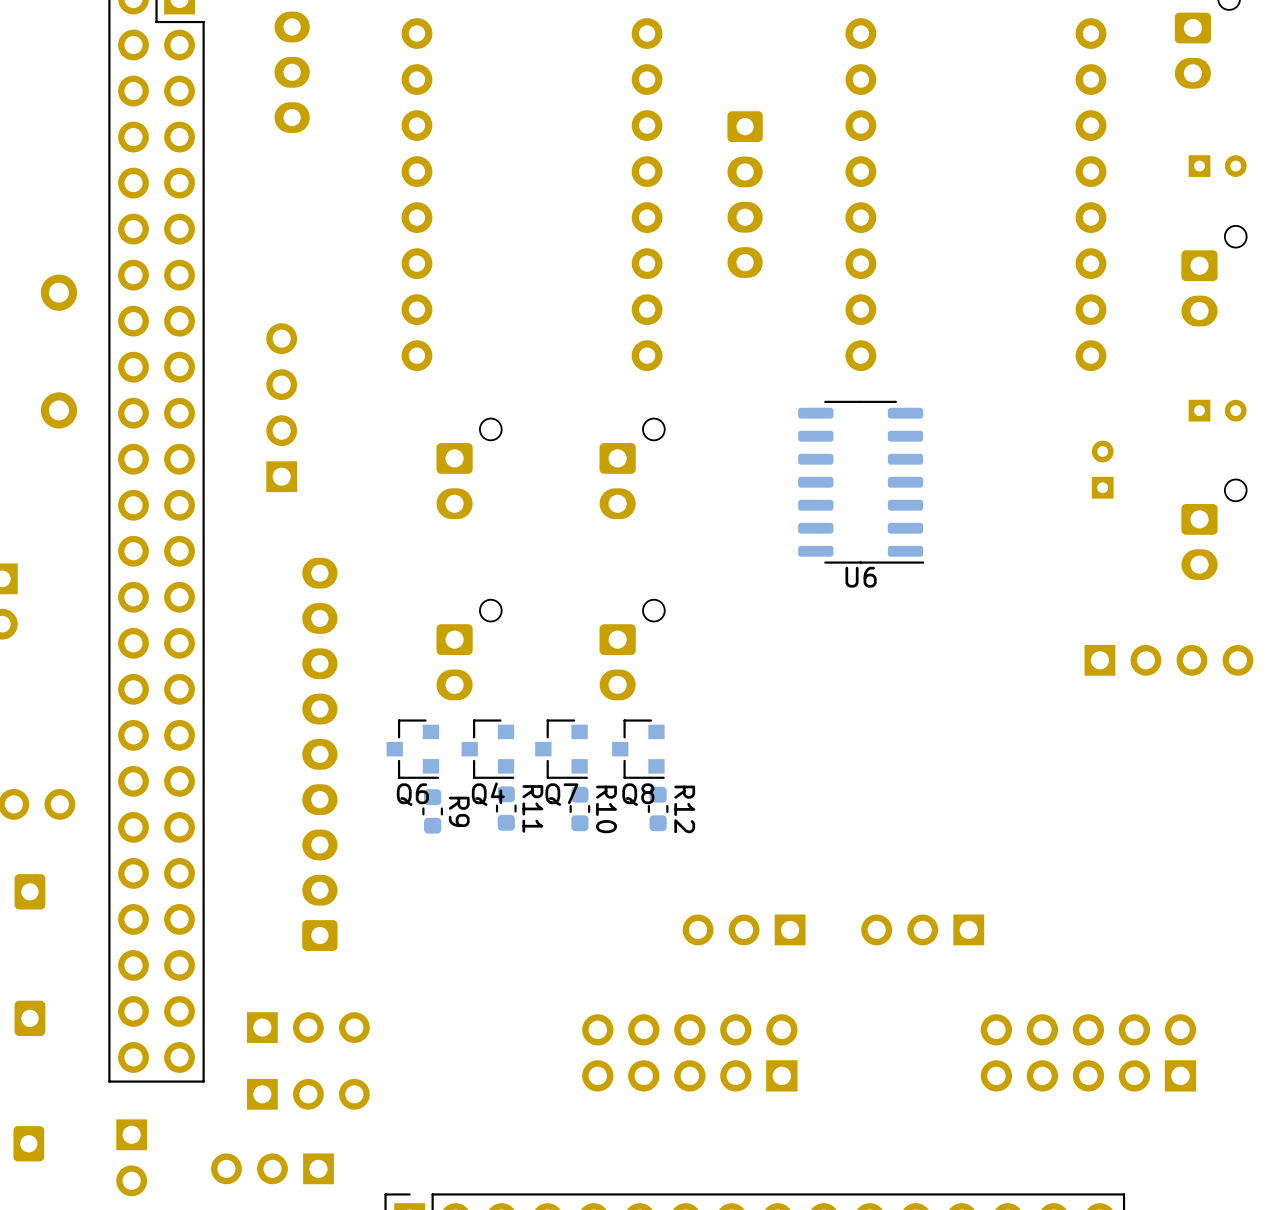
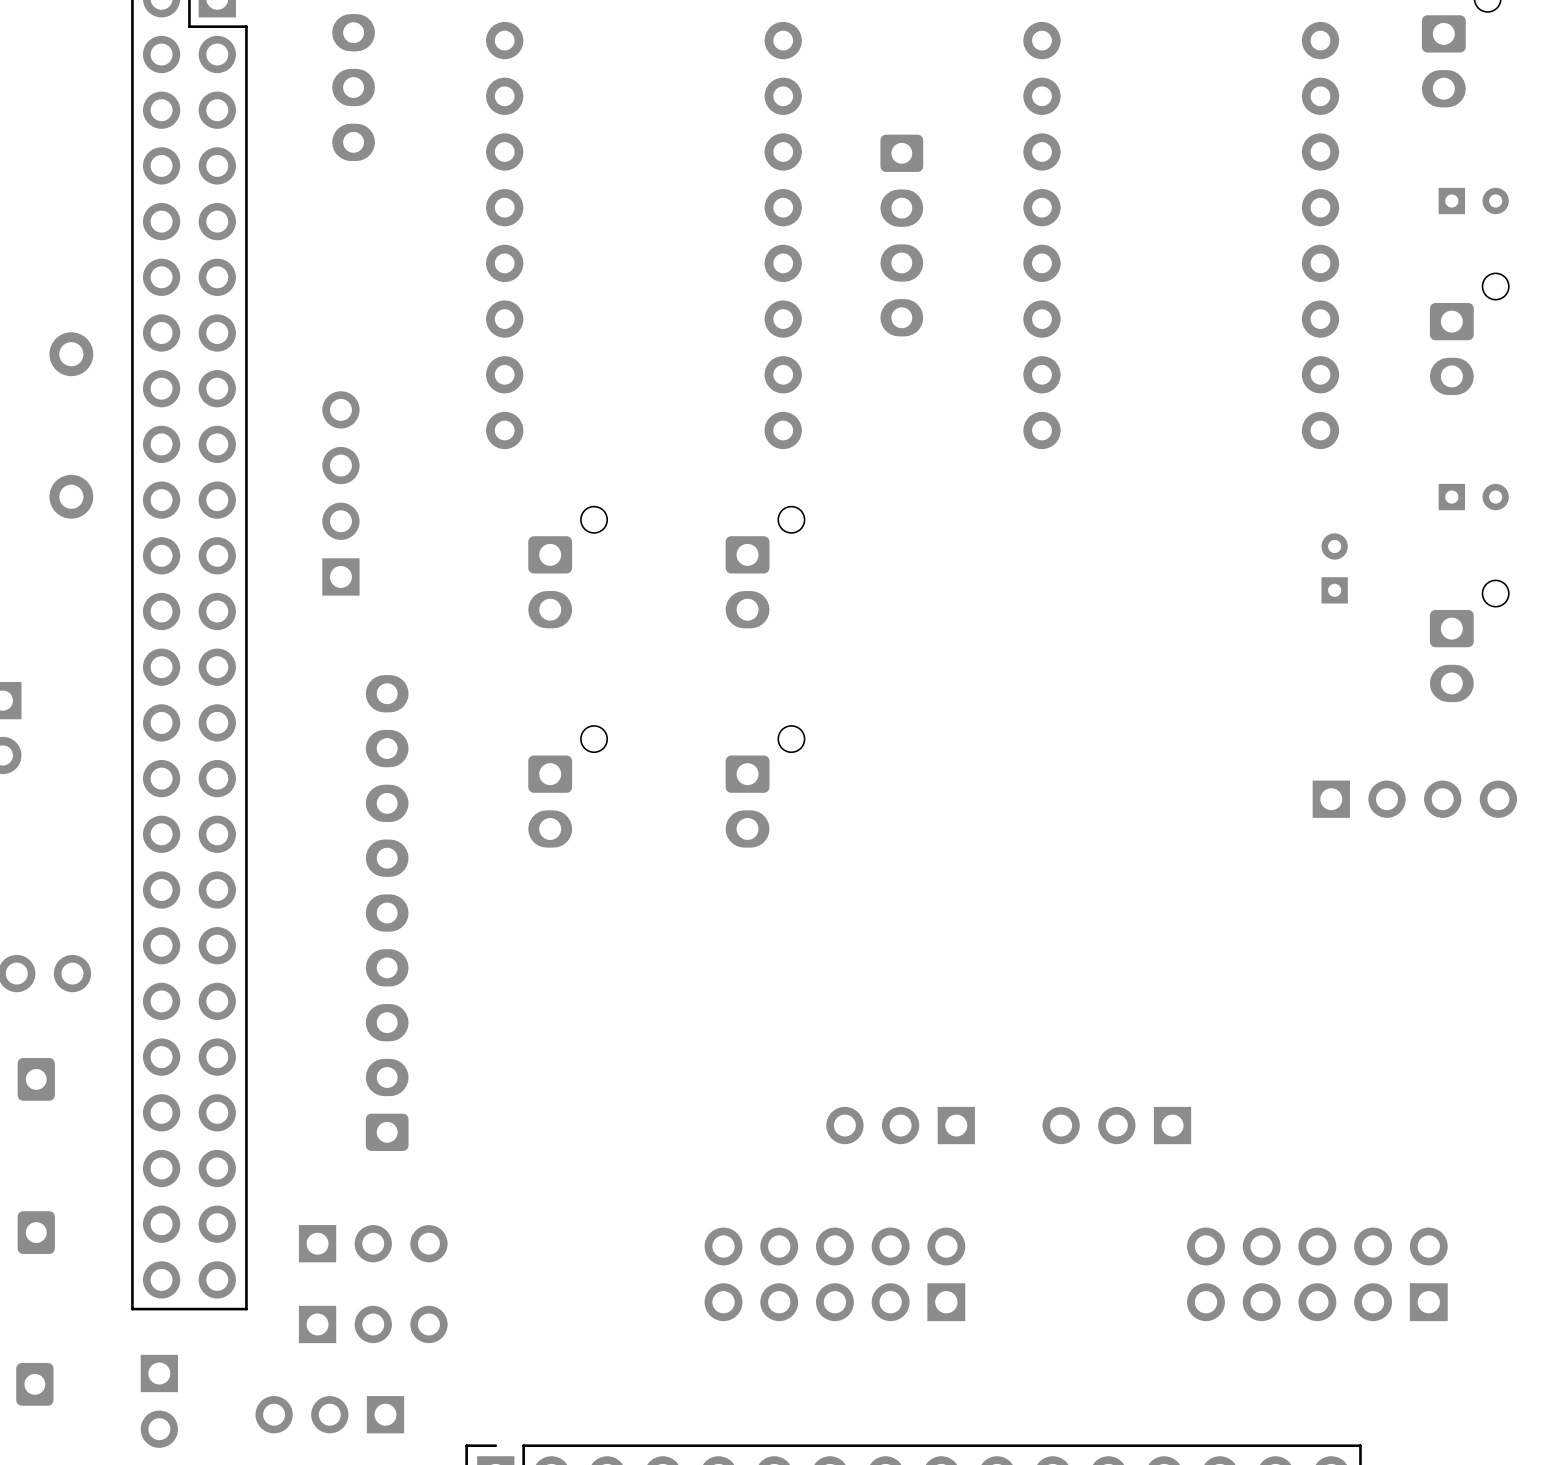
U6: (861, 482) -> none
Q6: (412, 749) -> none
Q4: (487, 749) -> none
Q7: (561, 749) -> none
Q8: (638, 749) -> none
R11: (506, 808) -> none
R10: (579, 808) -> none
R12: (658, 808) -> none
R9: (432, 811) -> none

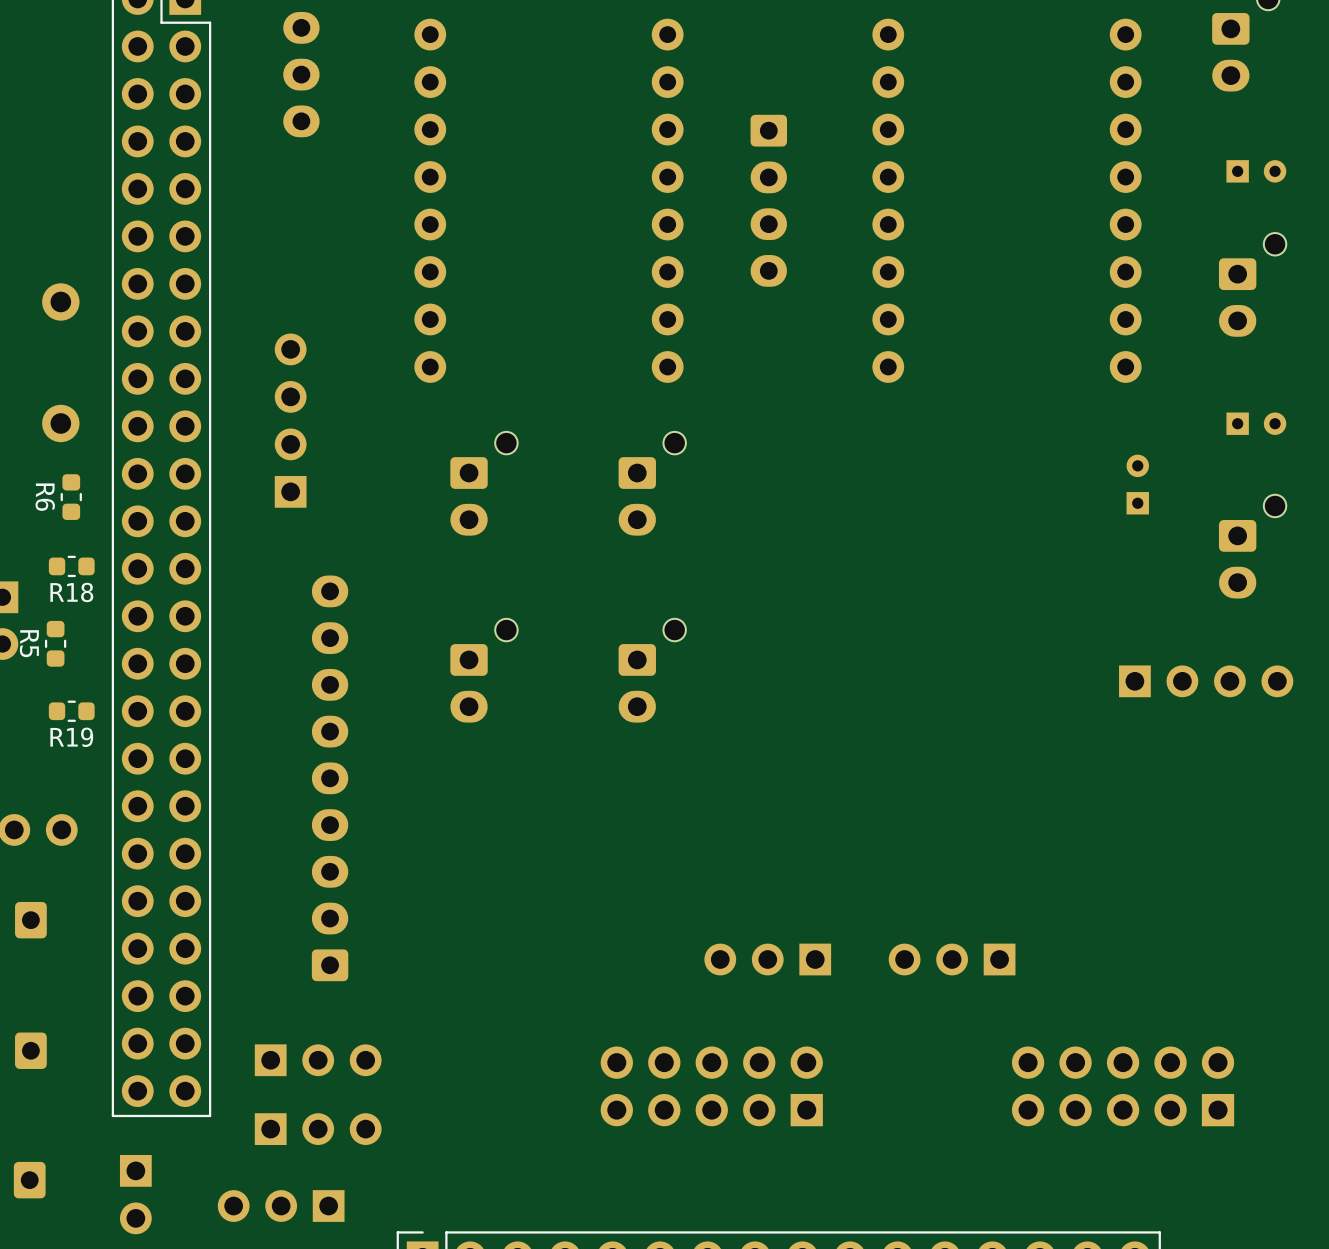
R6: none -> (71, 497)
R18: none -> (71, 566)
R5: none -> (55, 643)
R19: none -> (71, 711)

